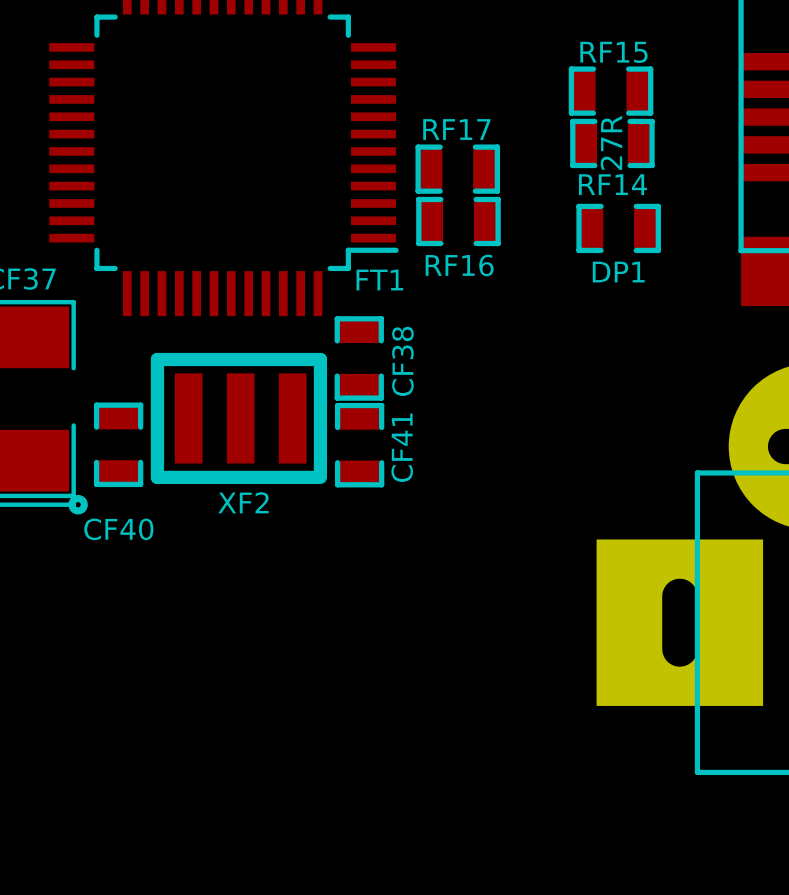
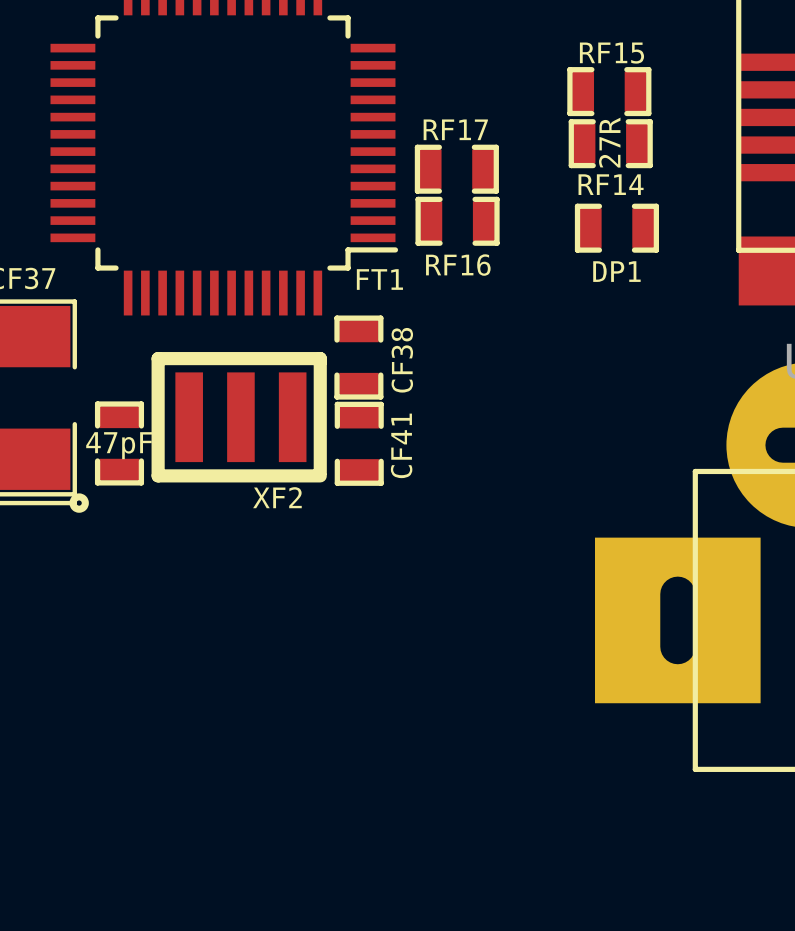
CF40 value: none -> 47pF (119, 445)
XF2 name position: XF2 (243, 502) -> XF2 (277, 497)
CF40 name: CF40 (118, 529) -> none

